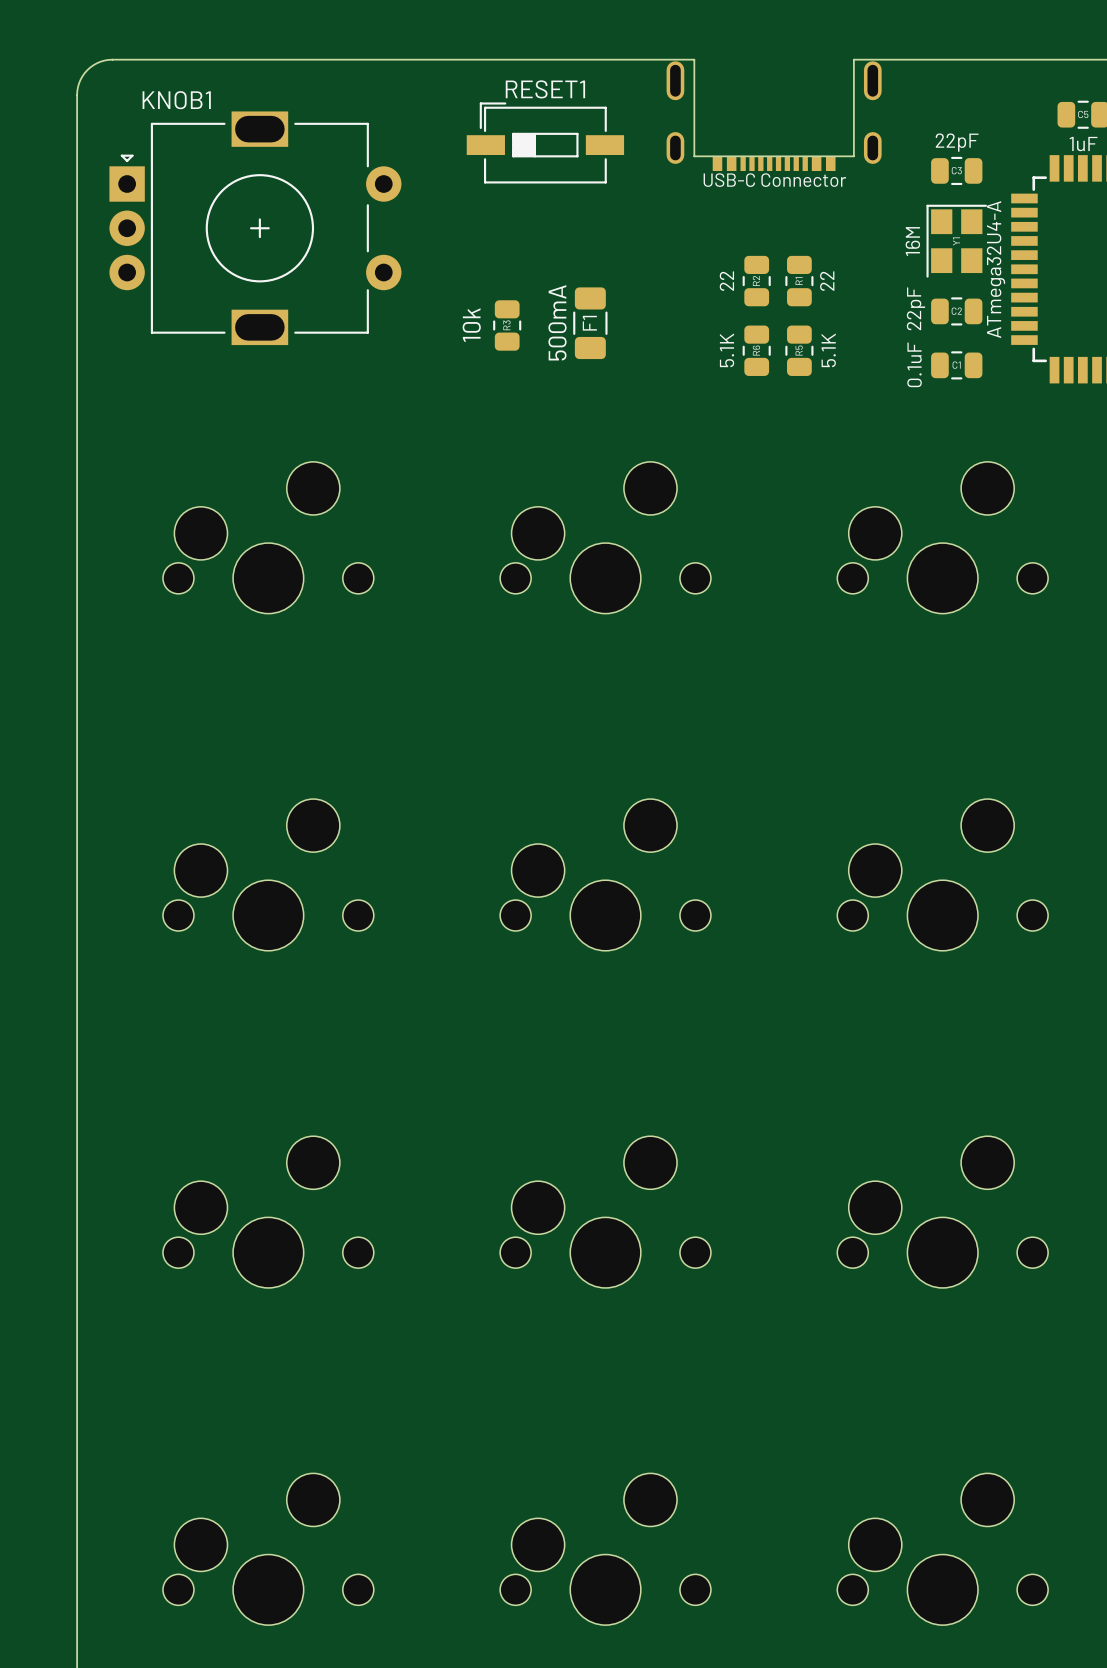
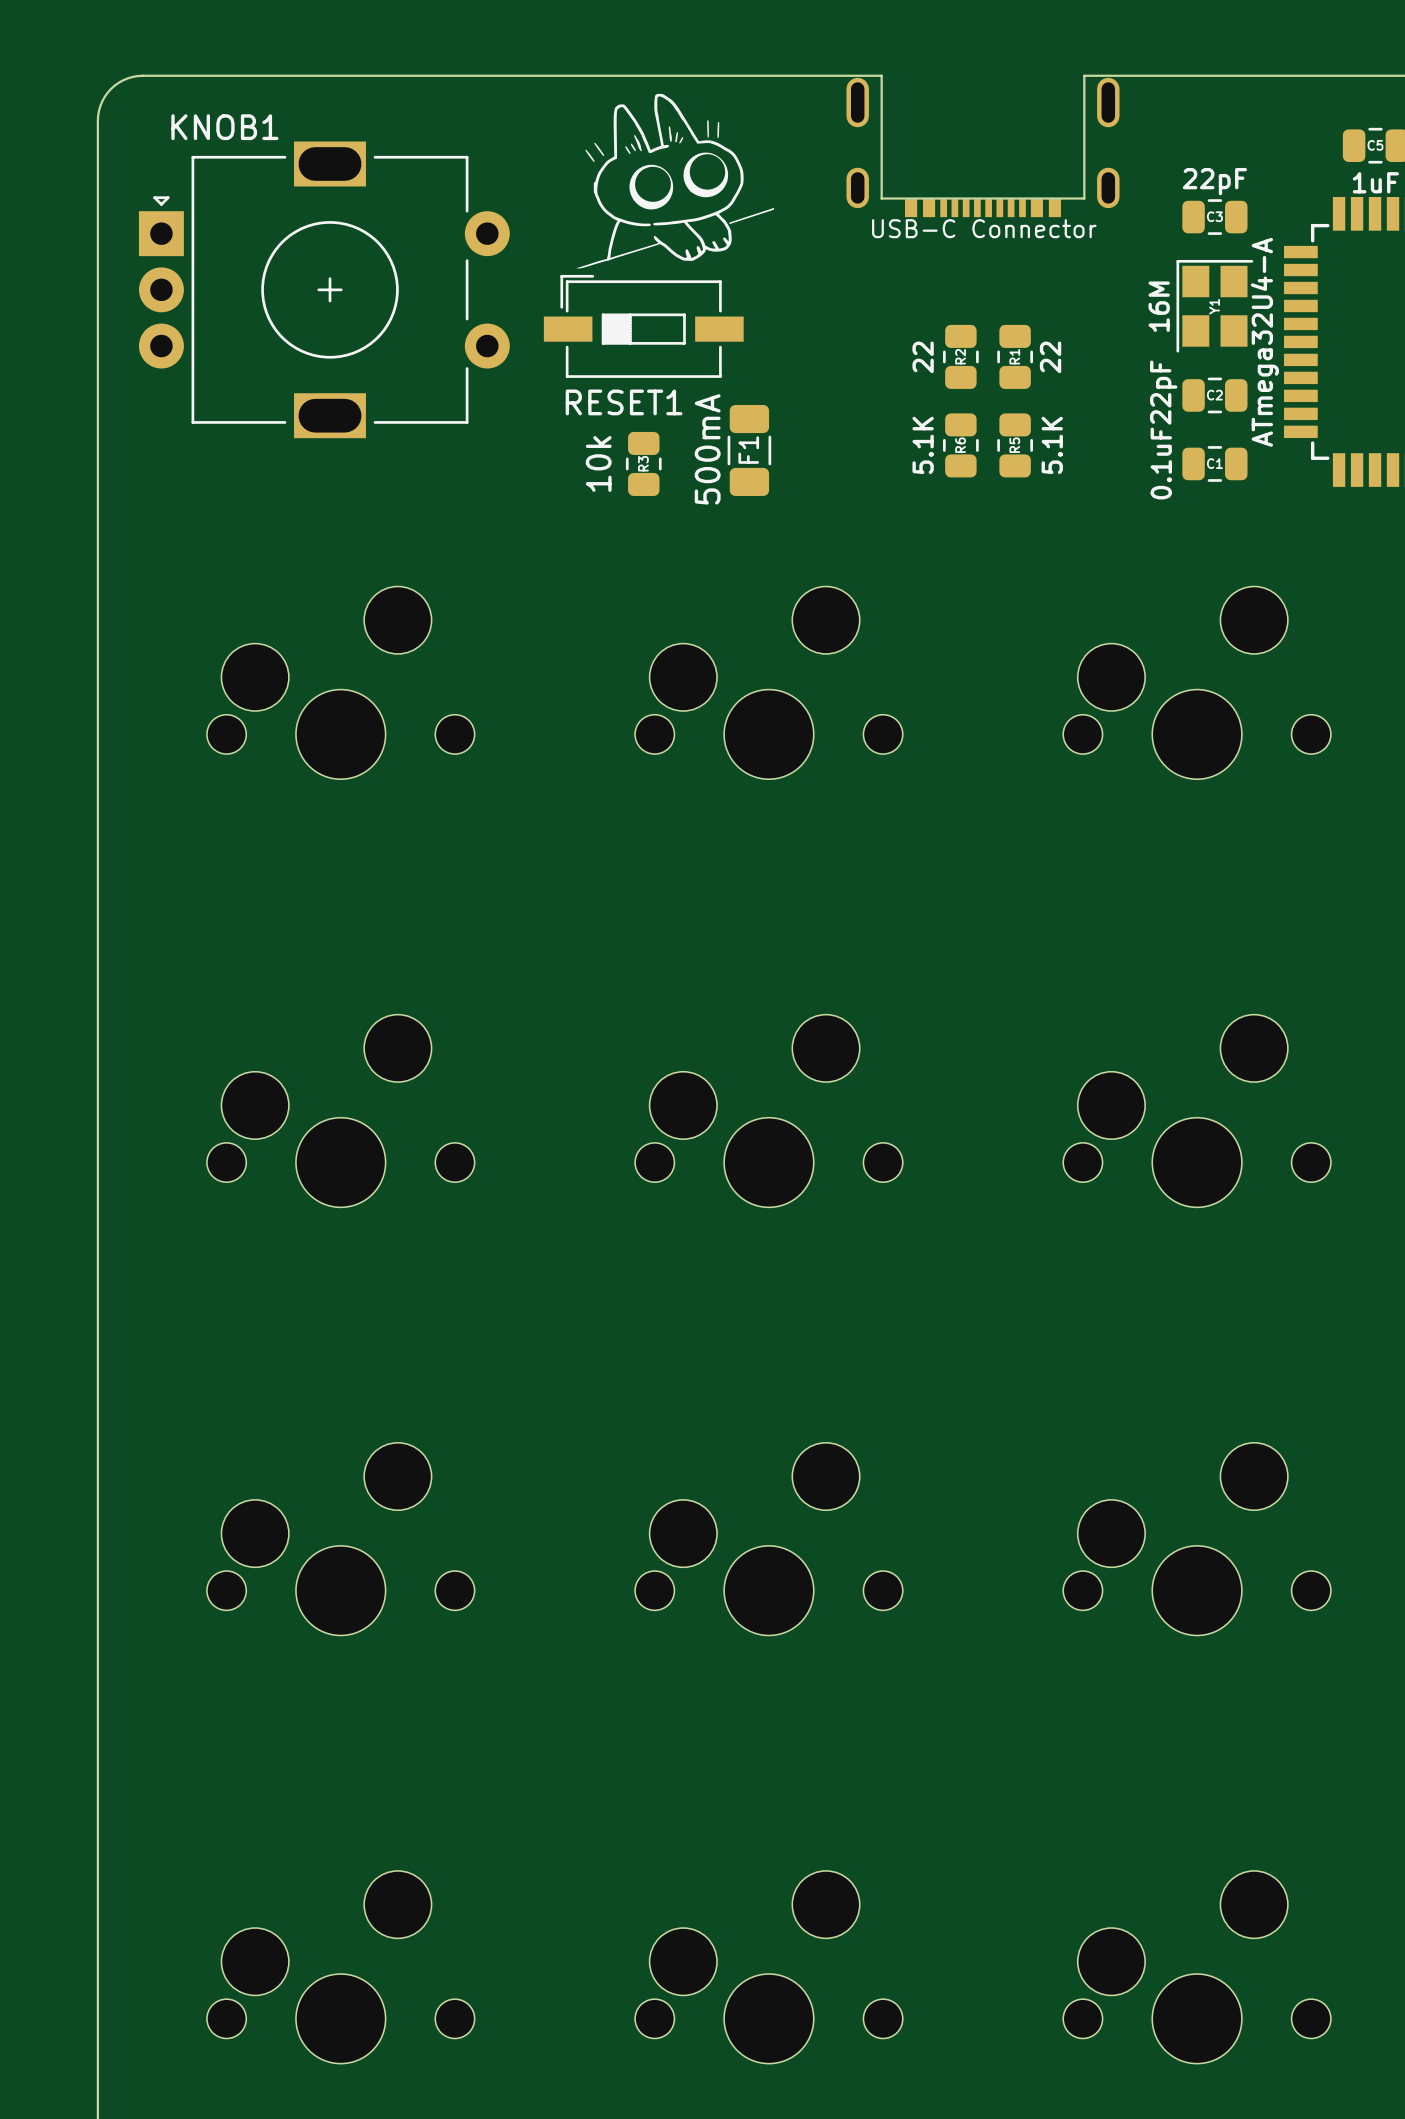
drawing: none -> [575, 93, 775, 269]
RESET1 name position: RESET1 (545, 89) -> RESET1 (624, 402)
RESET1 position: (545, 142) -> (643, 326)
F1 position: (590, 323) -> (749, 450)
R3 position: (507, 325) -> (643, 463)

